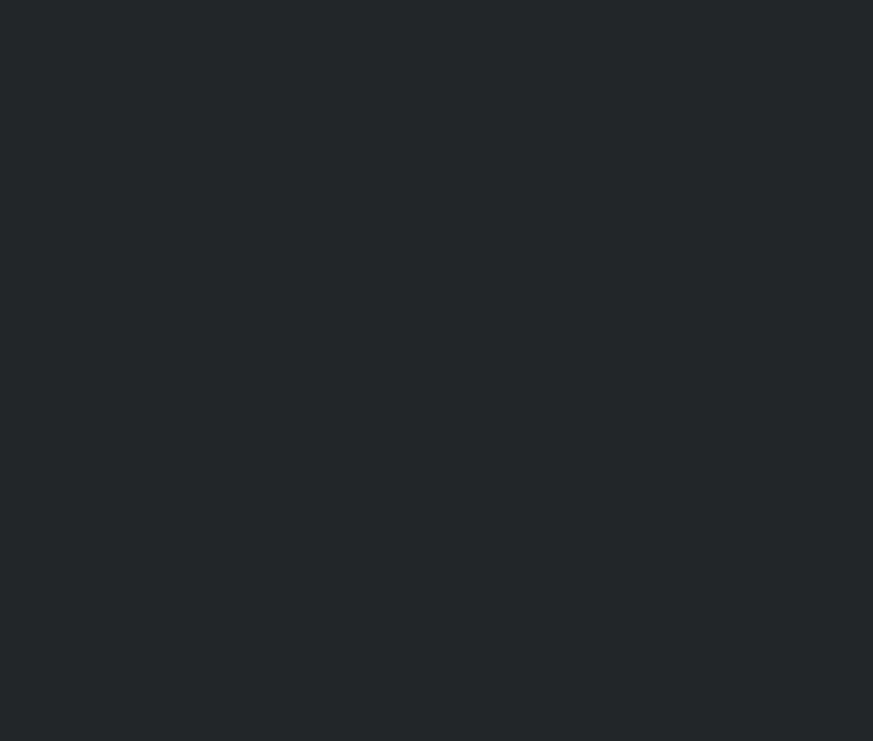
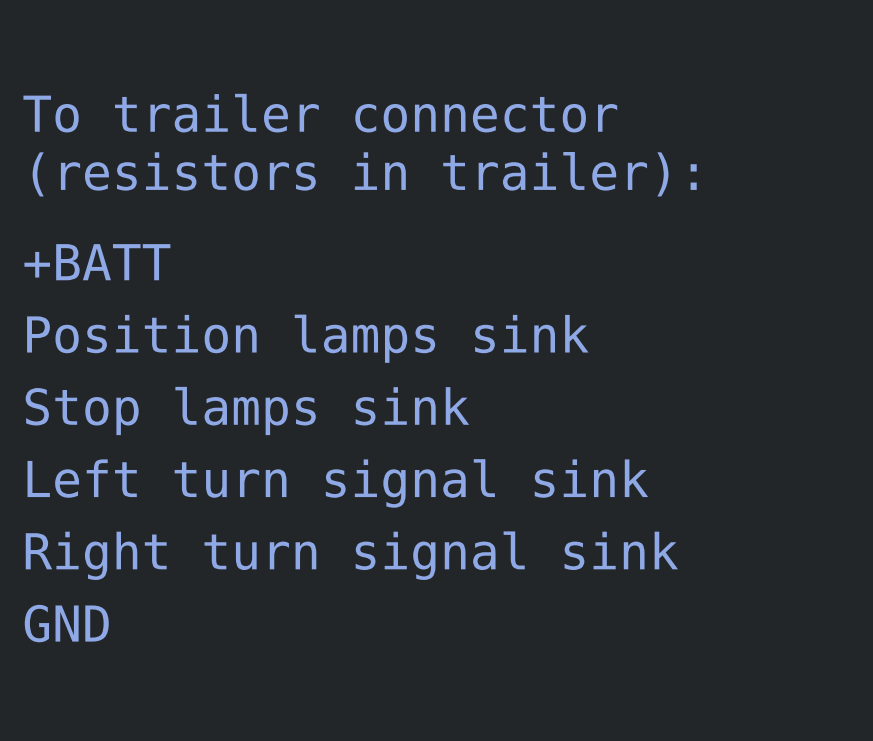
text: none -> To trailer connector (320, 113)
text: none -> (resistors in trailer): (364, 174)
text: none -> +BATT (97, 262)
text: none -> Position lamps sink (307, 338)
text: none -> Stop lamps sink (247, 410)
text: none -> Left turn signal sink (337, 483)
text: none -> Right turn signal sink (351, 555)
text: none -> GND (66, 623)

